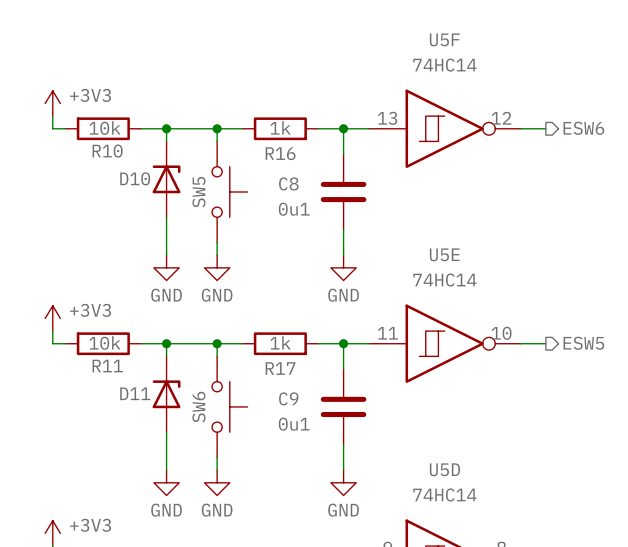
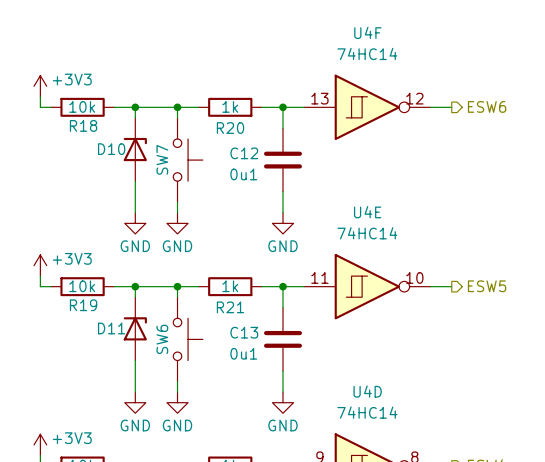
U5F name: U5F (444, 39) -> U4F (367, 32)
R10 name: R10 (107, 151) -> R18 (83, 125)
R16 name: R16 (280, 153) -> R20 (230, 128)
C8 name: C8 (288, 183) -> C12 (244, 153)
SW5 name: SW5 (198, 192) -> SW7 (162, 159)
U5E name: U5E (444, 254) -> U4E (367, 212)
R11 name: R11 (107, 366) -> R19 (83, 305)
R17 name: R17 (280, 368) -> R21 (230, 307)
C9 name: C9 (288, 398) -> C13 (244, 332)
U5D name: U5D (444, 469) -> U4D (367, 391)

